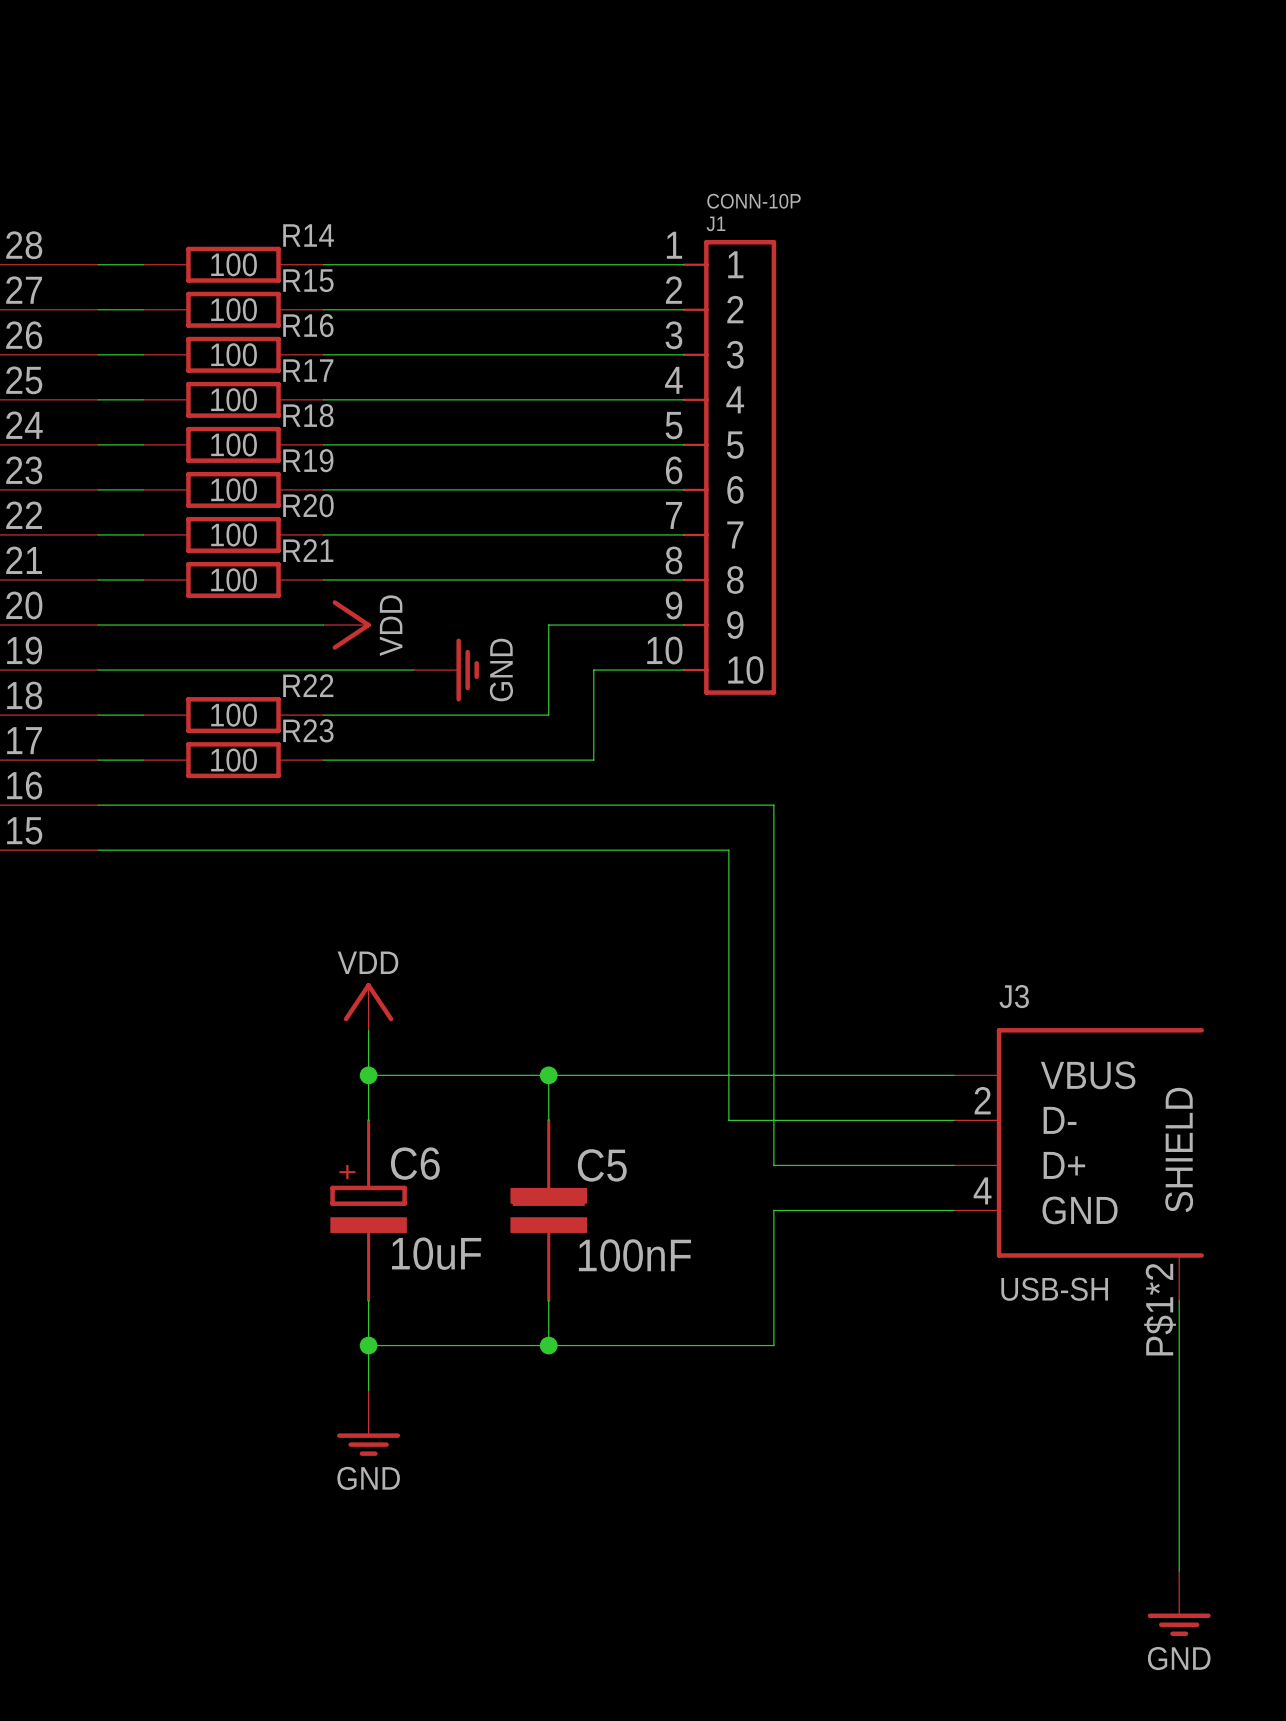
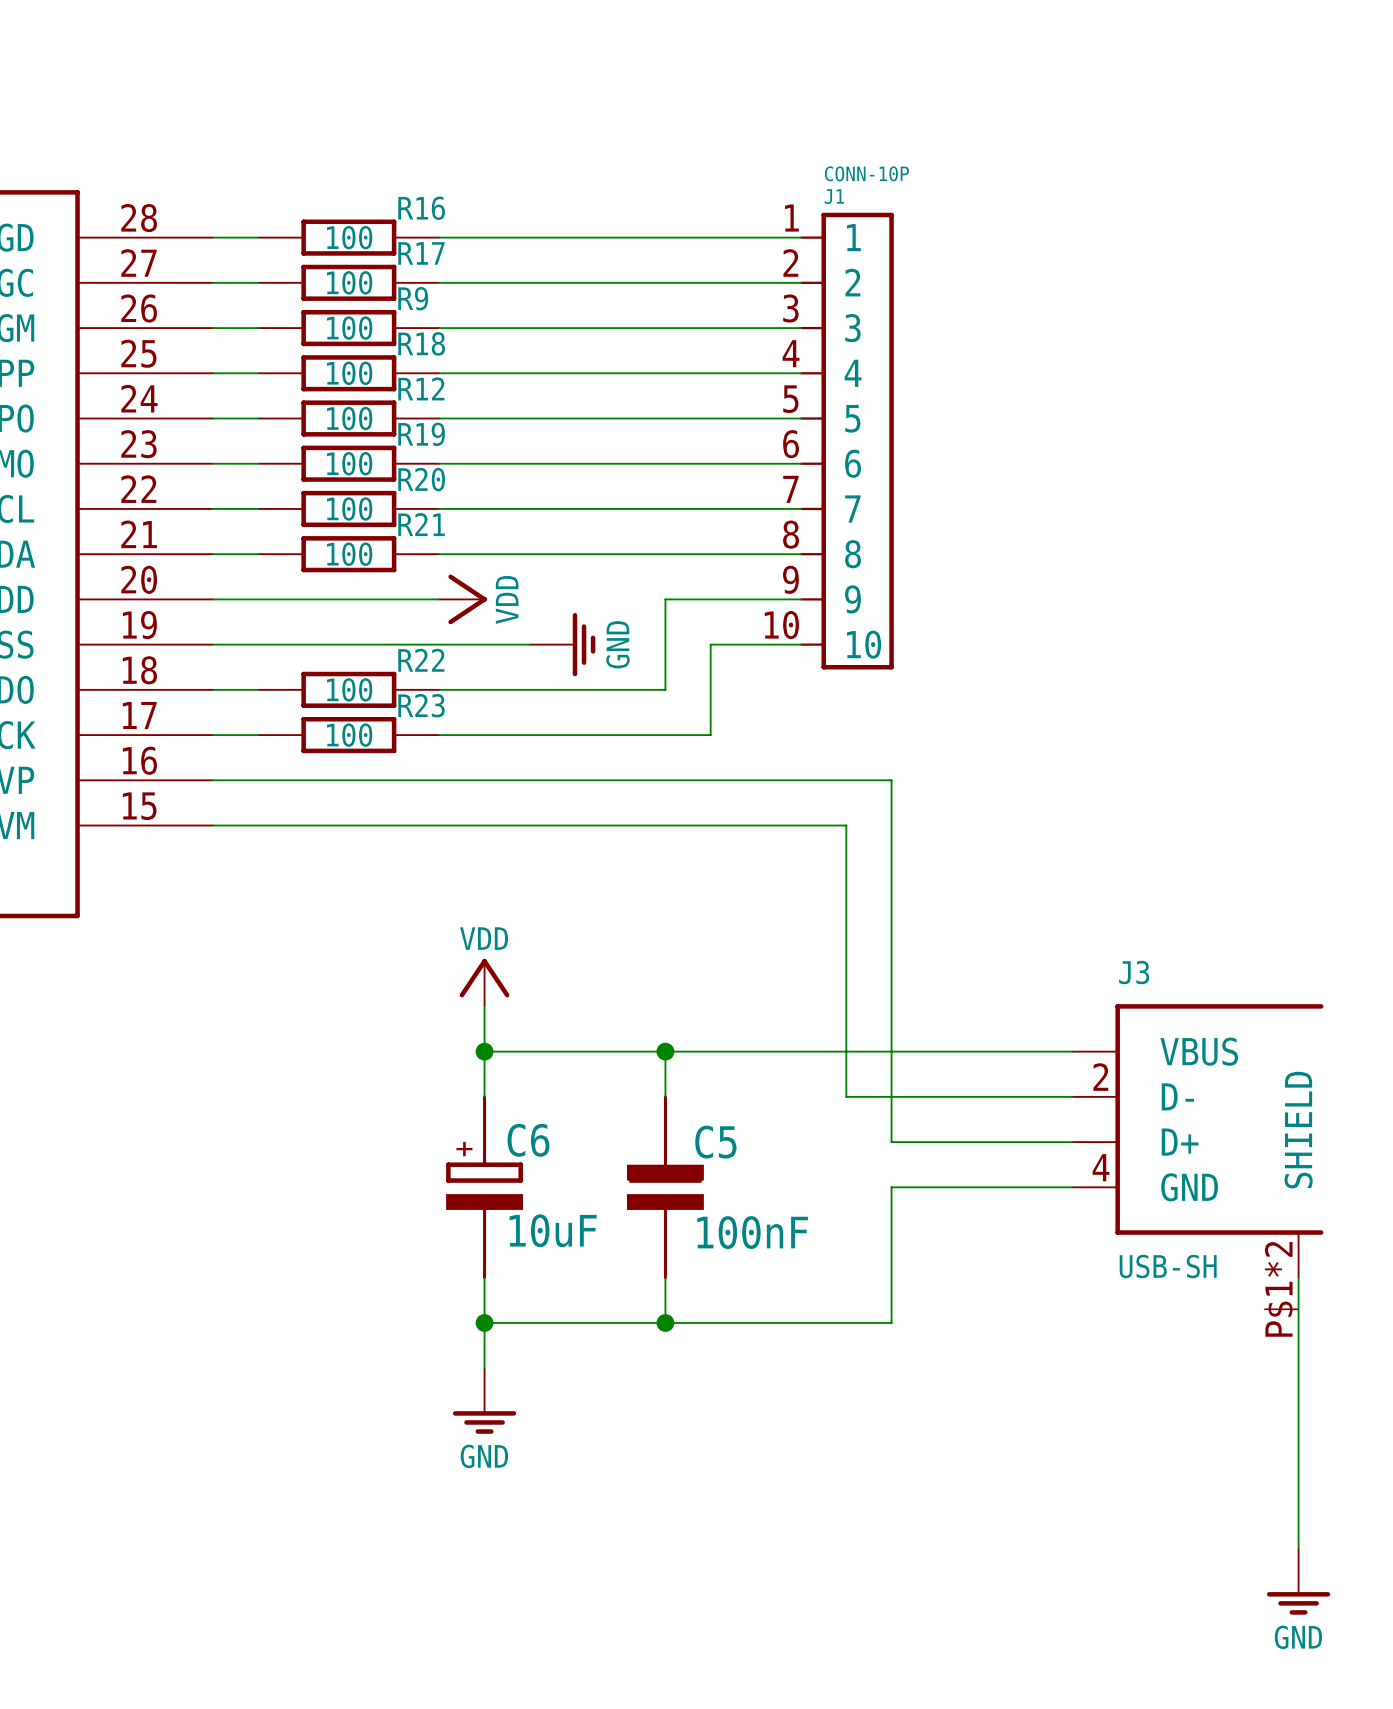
R14 name: R14 (308, 235) -> R16 (421, 208)
R15 name: R15 (308, 280) -> R17 (421, 253)
R16 name: R16 (308, 325) -> R9 (413, 298)
R17 name: R17 (308, 370) -> R18 (421, 343)
R18 name: R18 (308, 415) -> R12 (421, 388)

